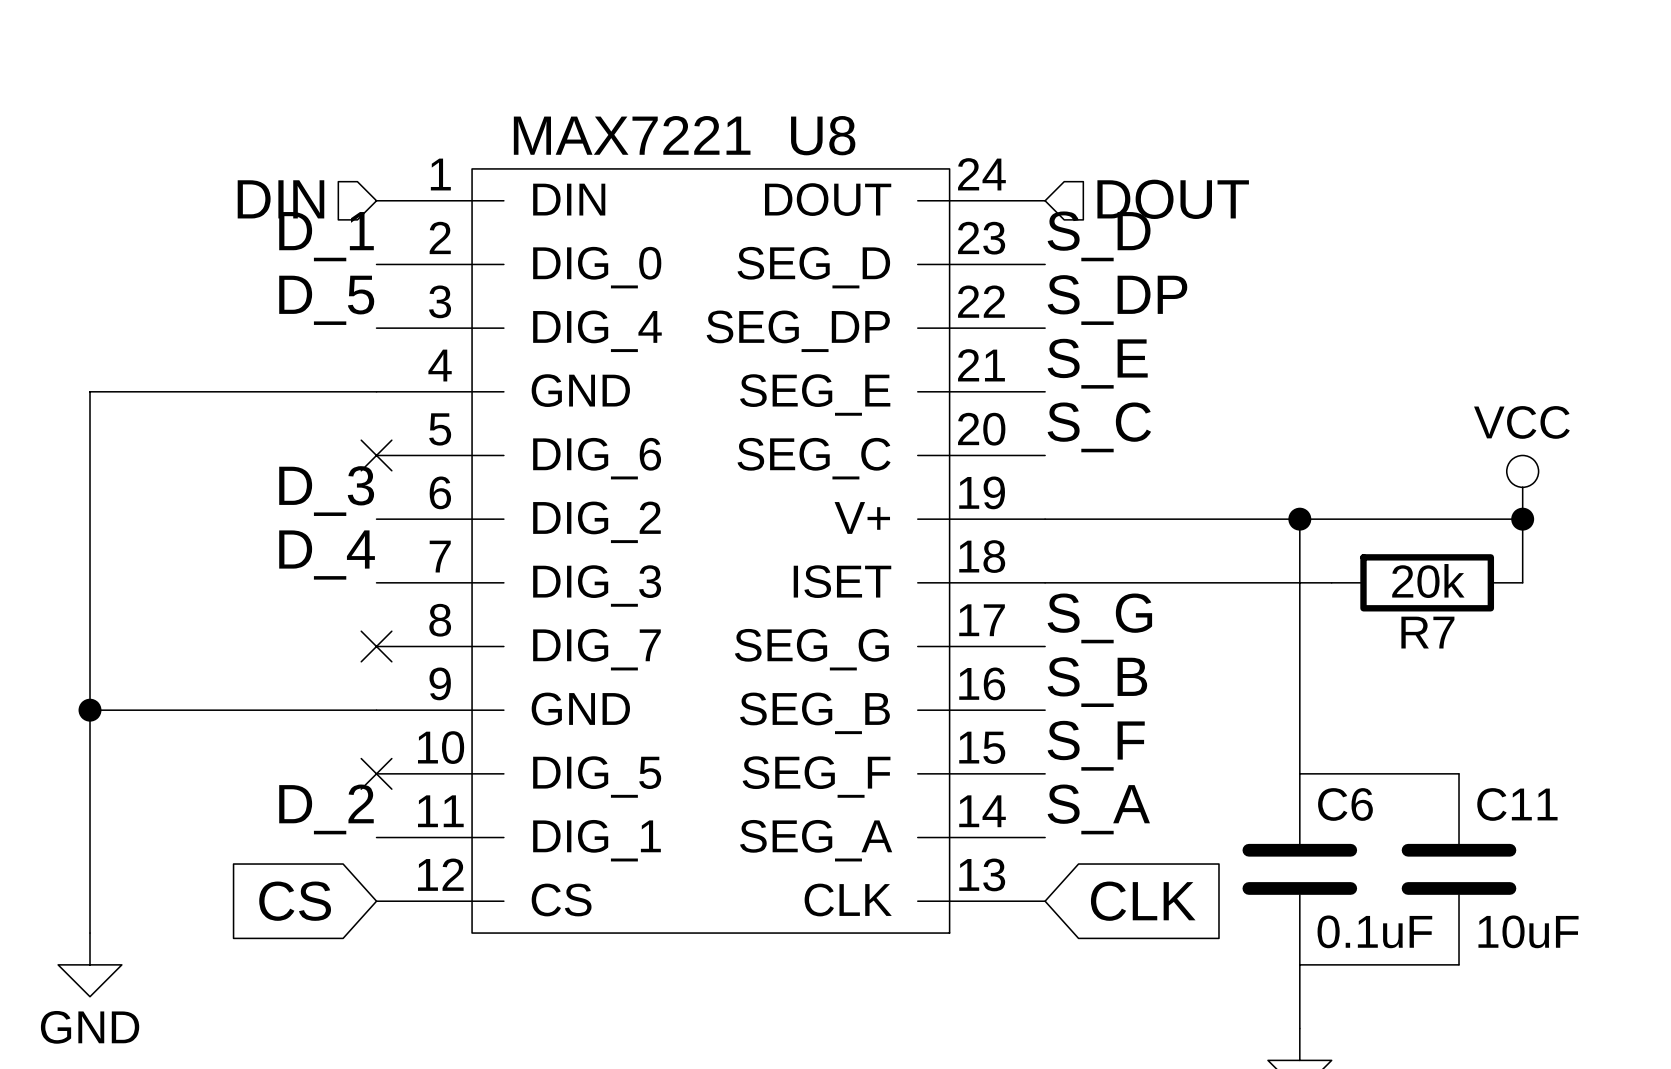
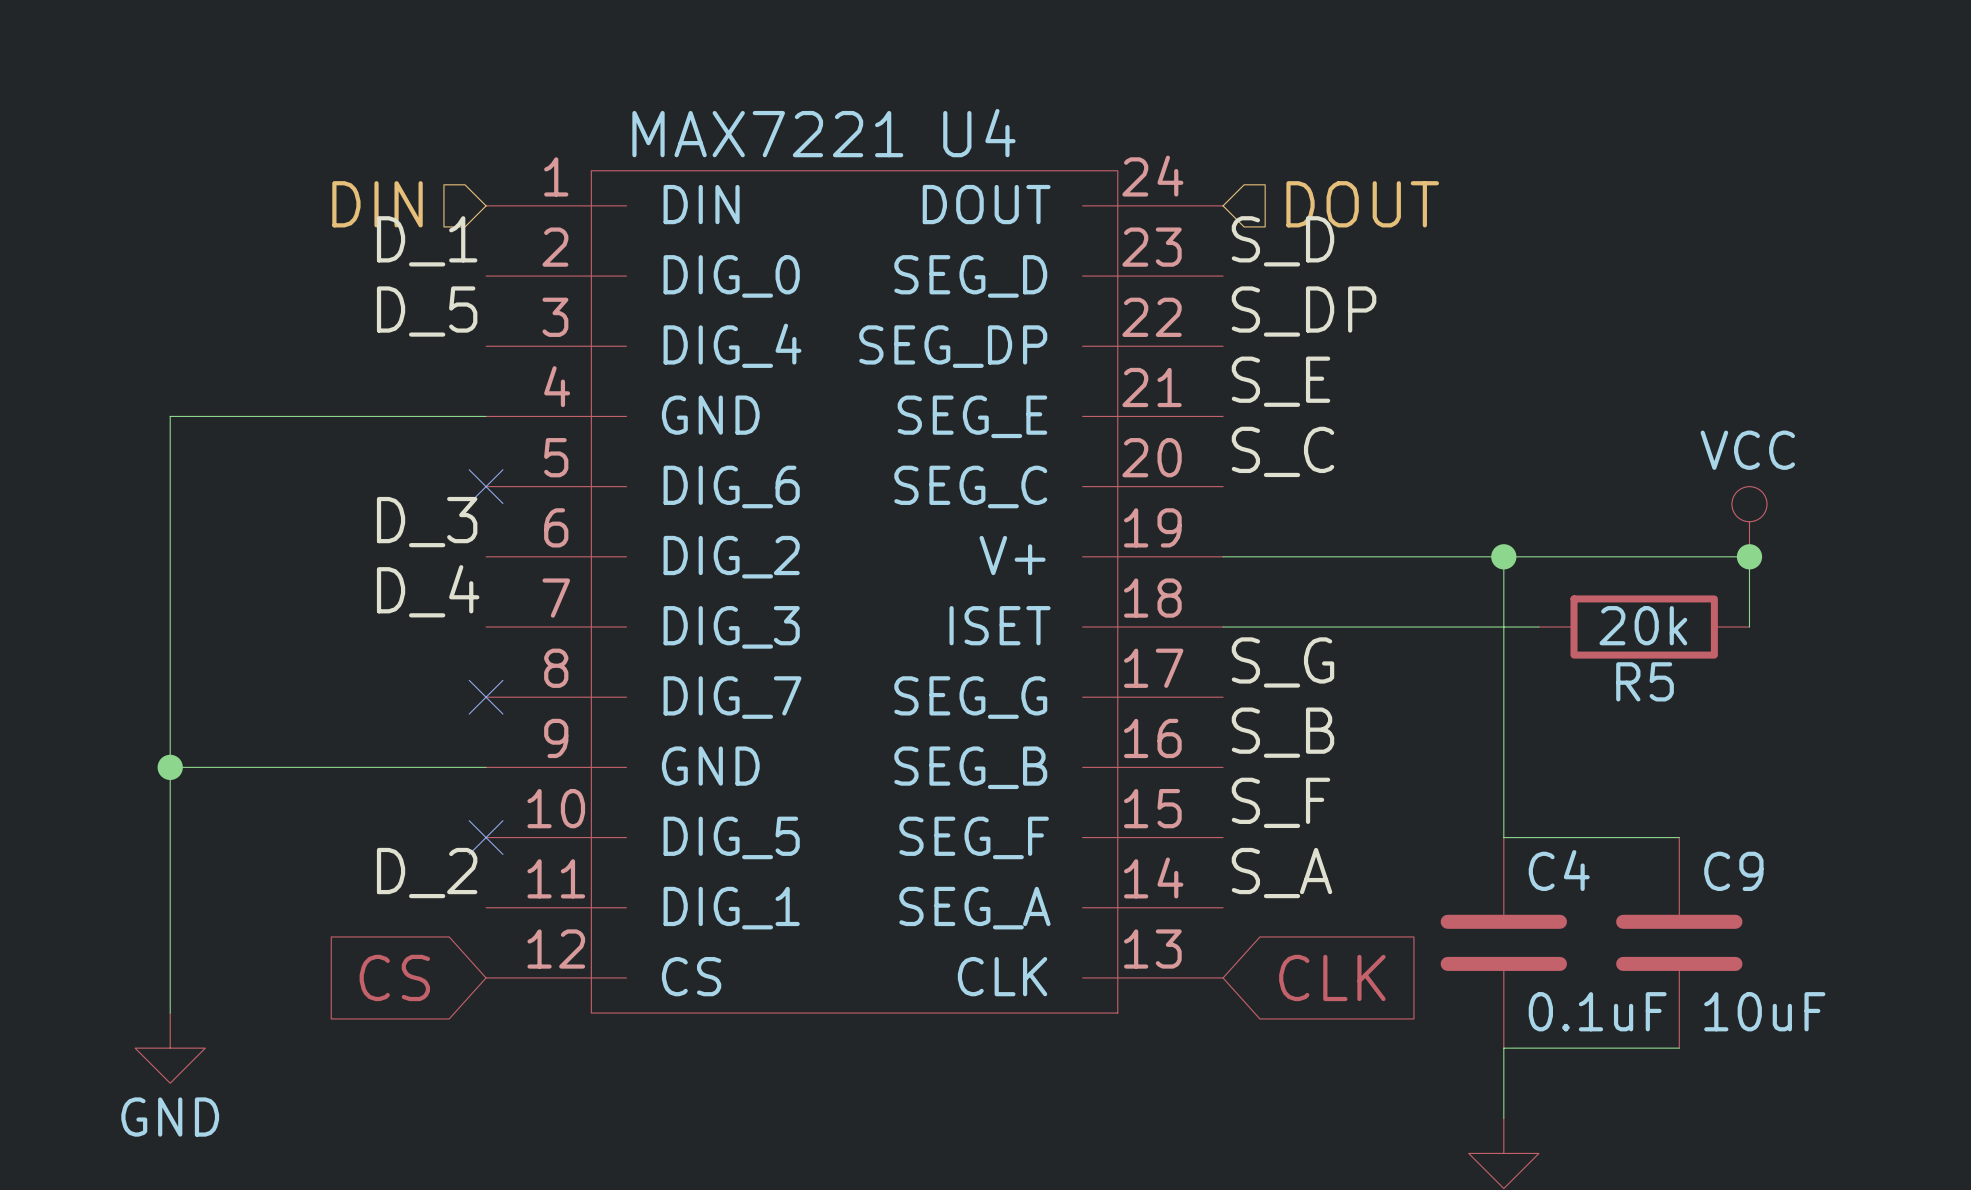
U8 name: U8 (823, 135) -> U4 (979, 133)
R7 name: R7 (1427, 632) -> R5 (1645, 681)
C6 name: C6 (1345, 804) -> C4 (1559, 870)
C11 name: C11 (1517, 804) -> C9 (1733, 871)

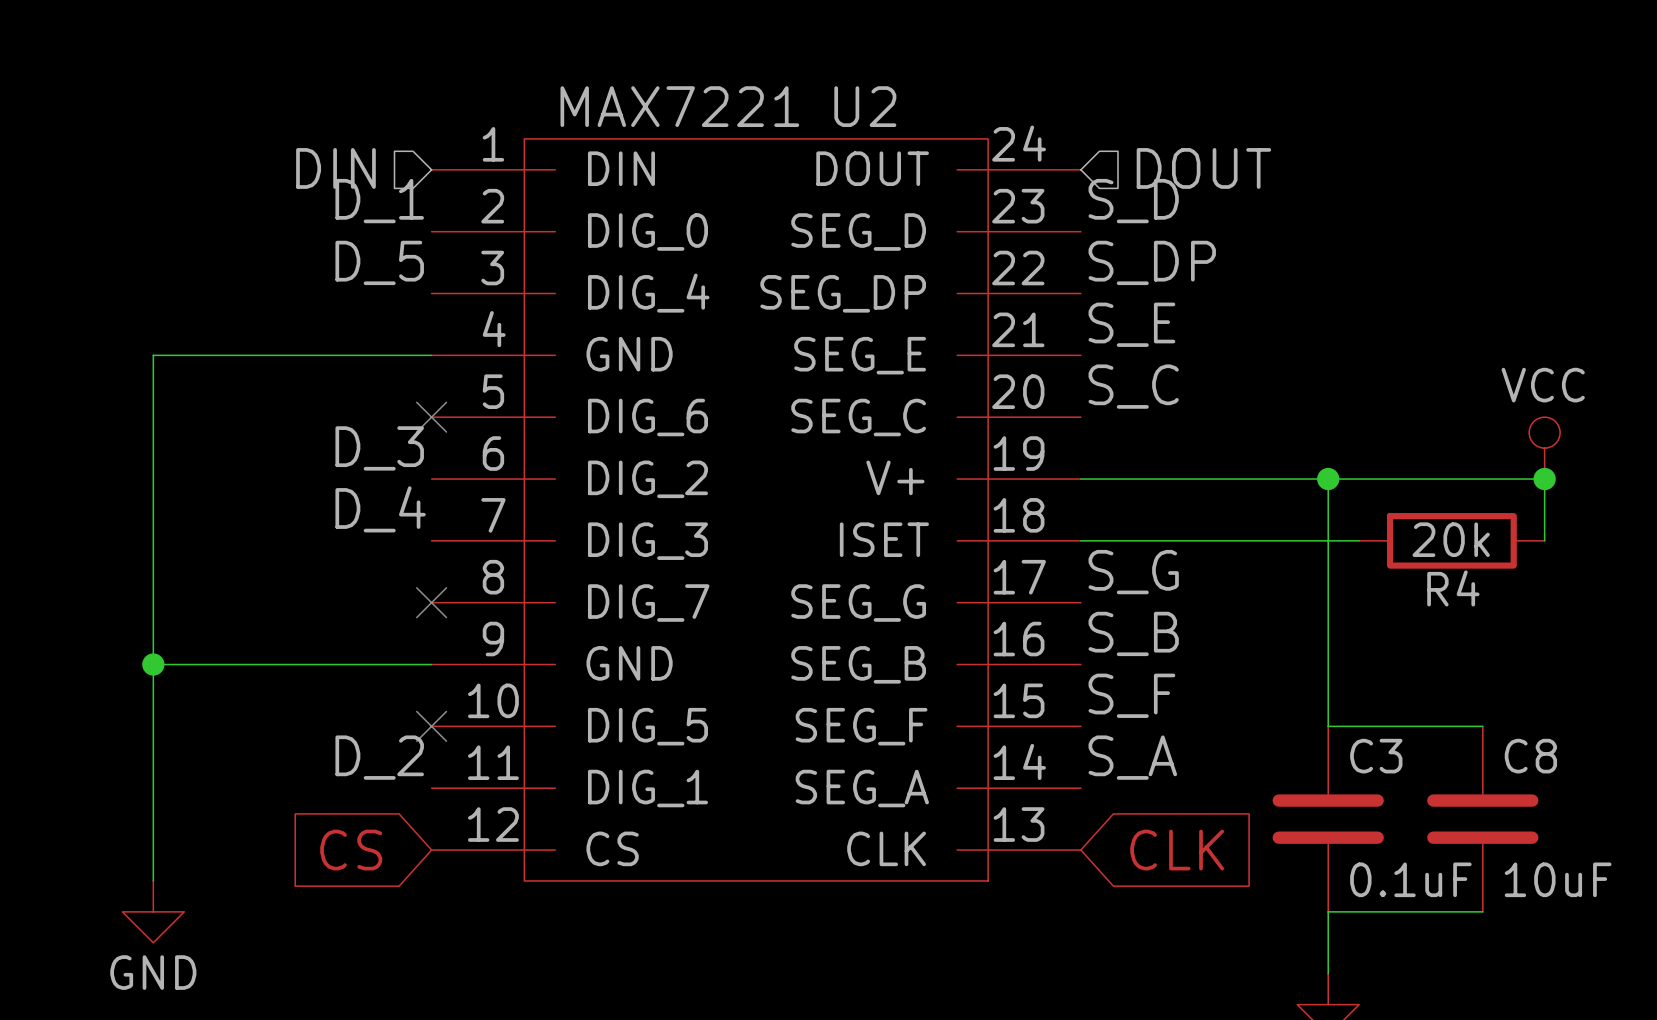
U4 name: U4 (979, 133) -> U2 (865, 106)
R5 name: R5 (1645, 681) -> R4 (1453, 588)
C4 name: C4 (1559, 870) -> C3 (1376, 756)
C9 name: C9 (1733, 871) -> C8 (1530, 756)

